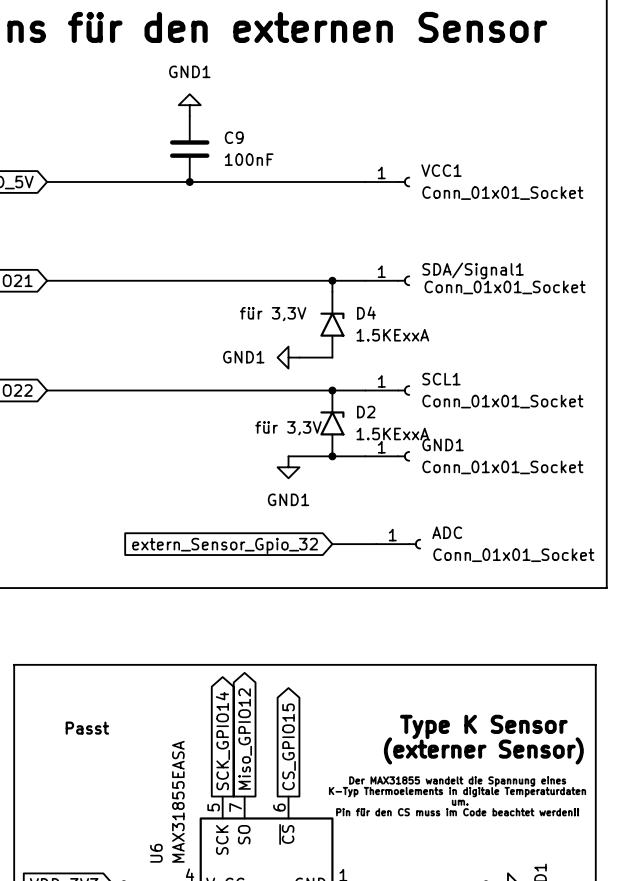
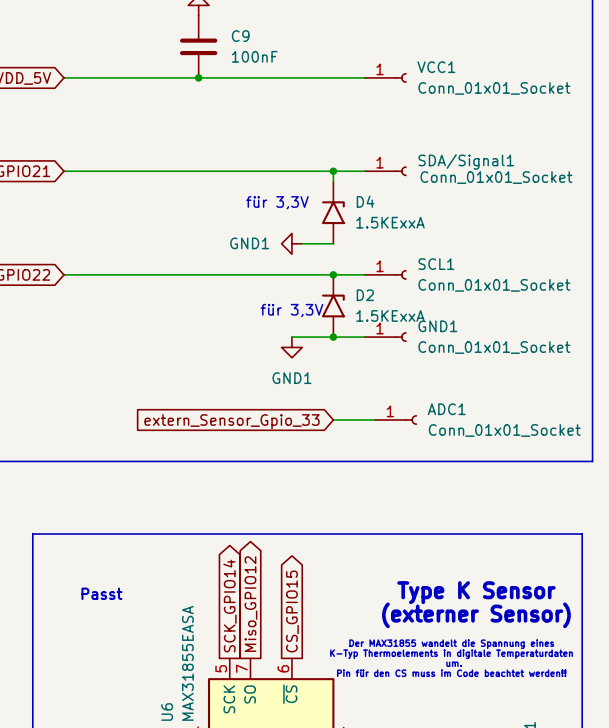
ADC name: ADC (447, 532) -> ADC1 (446, 409)
global label: extern_Sensor_Gpio_32 (225, 545) -> extern_Sensor_Gpio_33 (232, 421)

